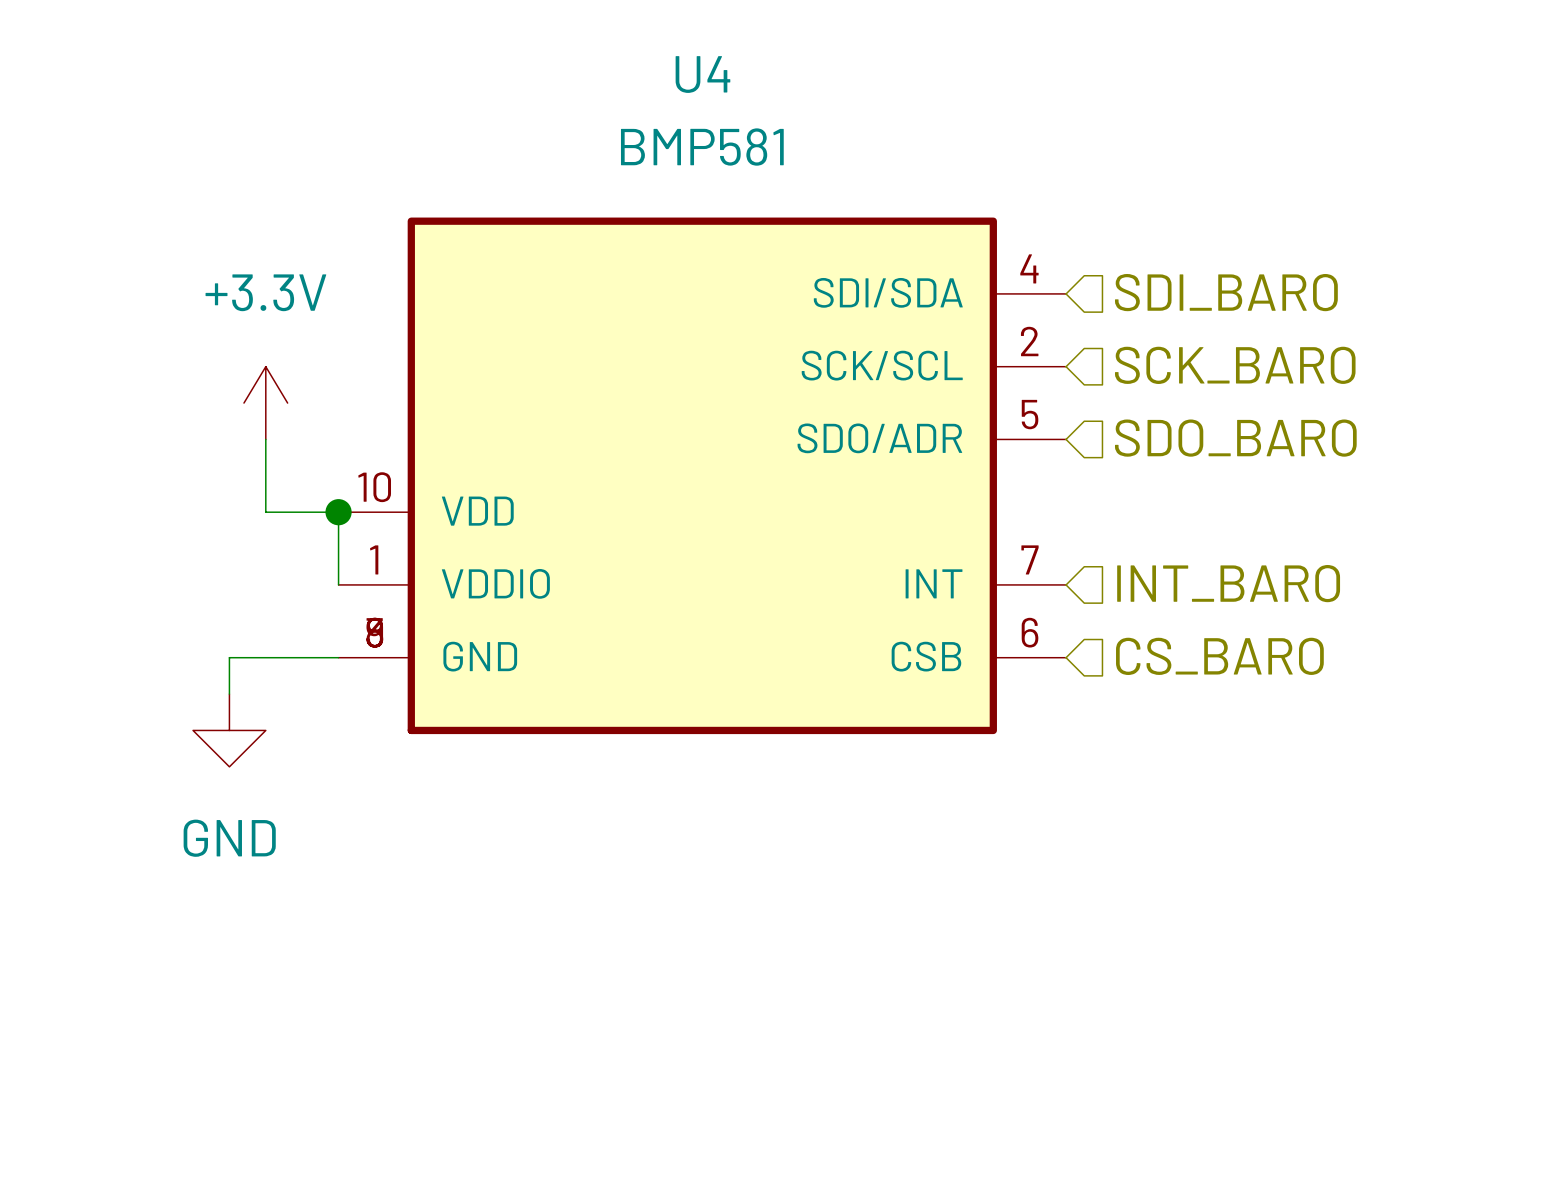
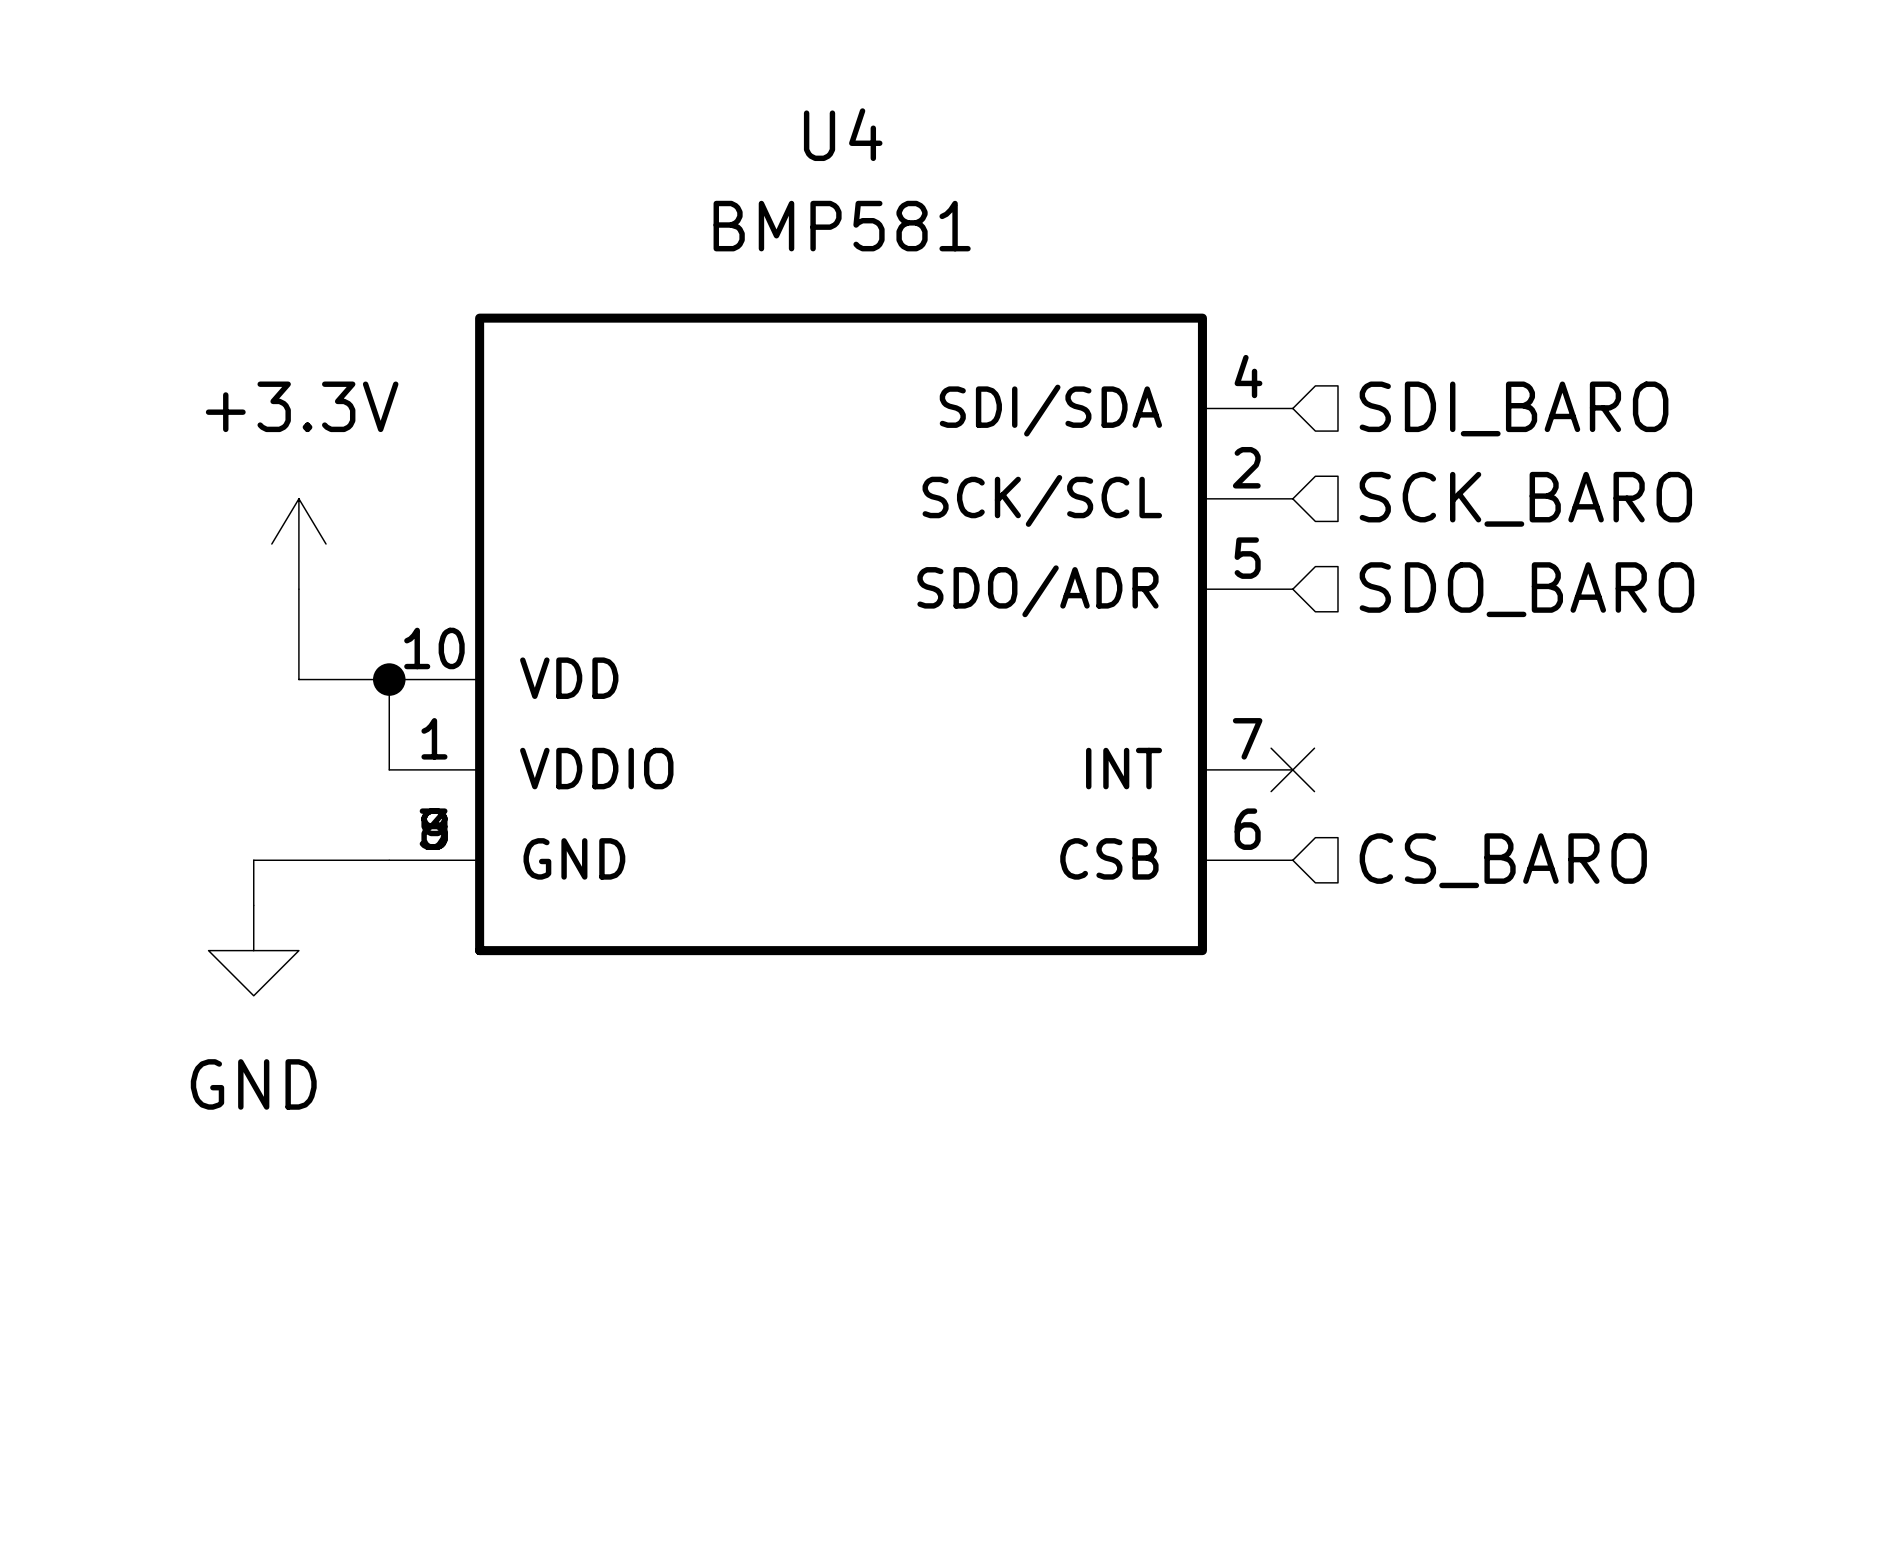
hierarchical label: INT_BARO (1228, 583) -> none
no-connect mark: none -> (1292, 769)

